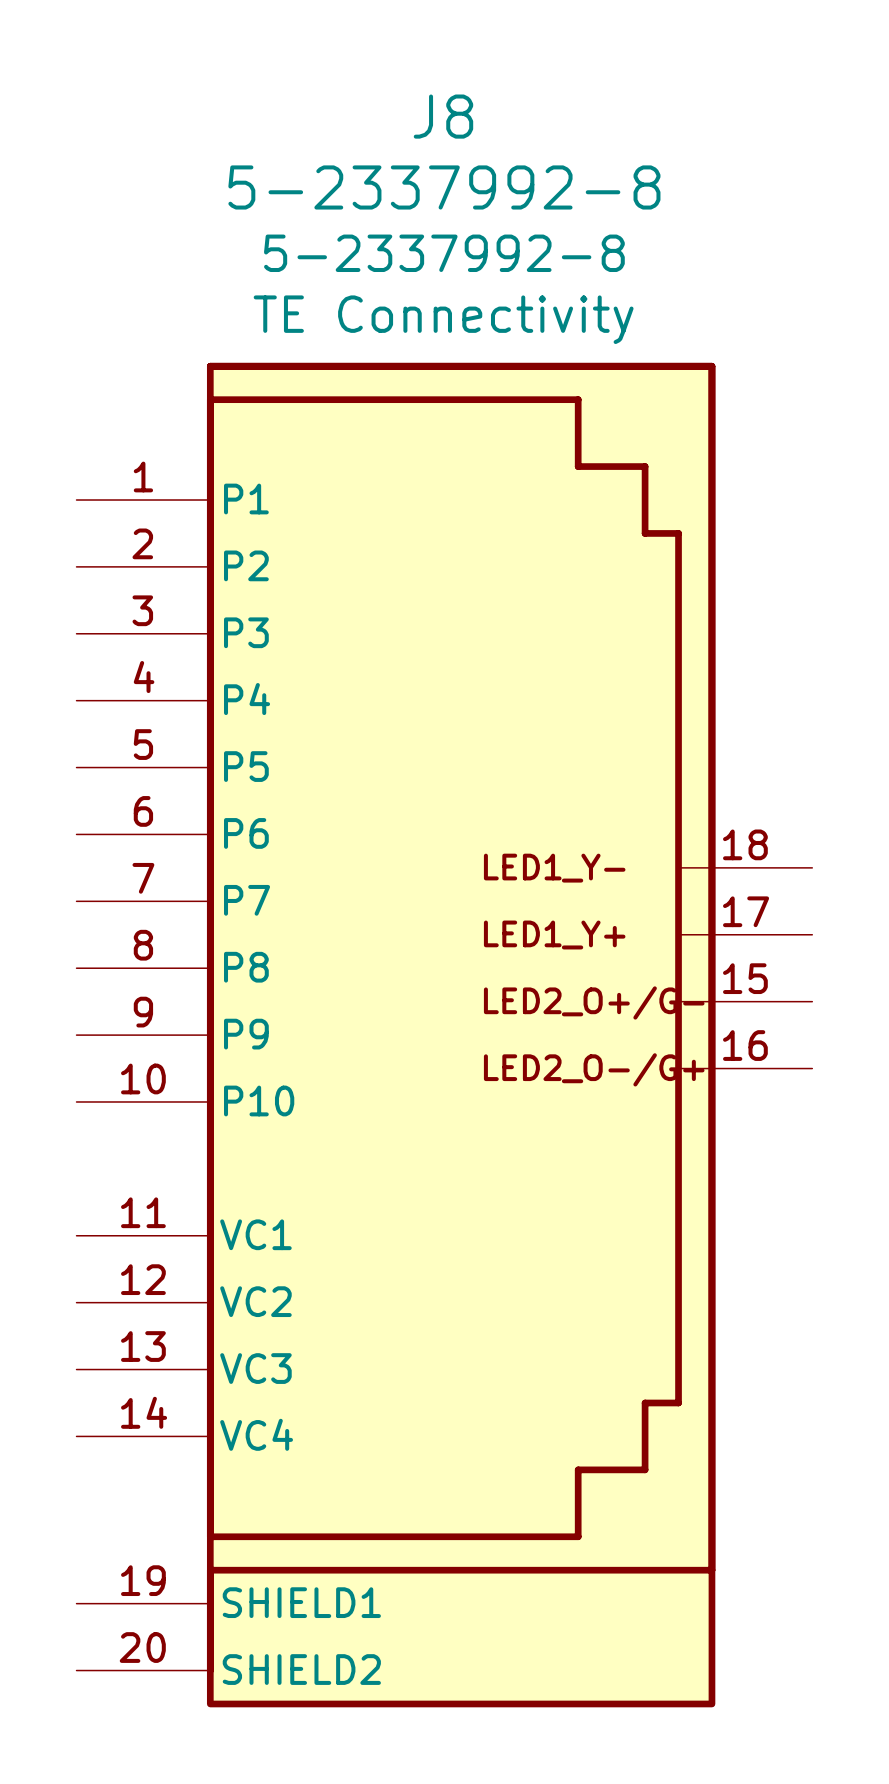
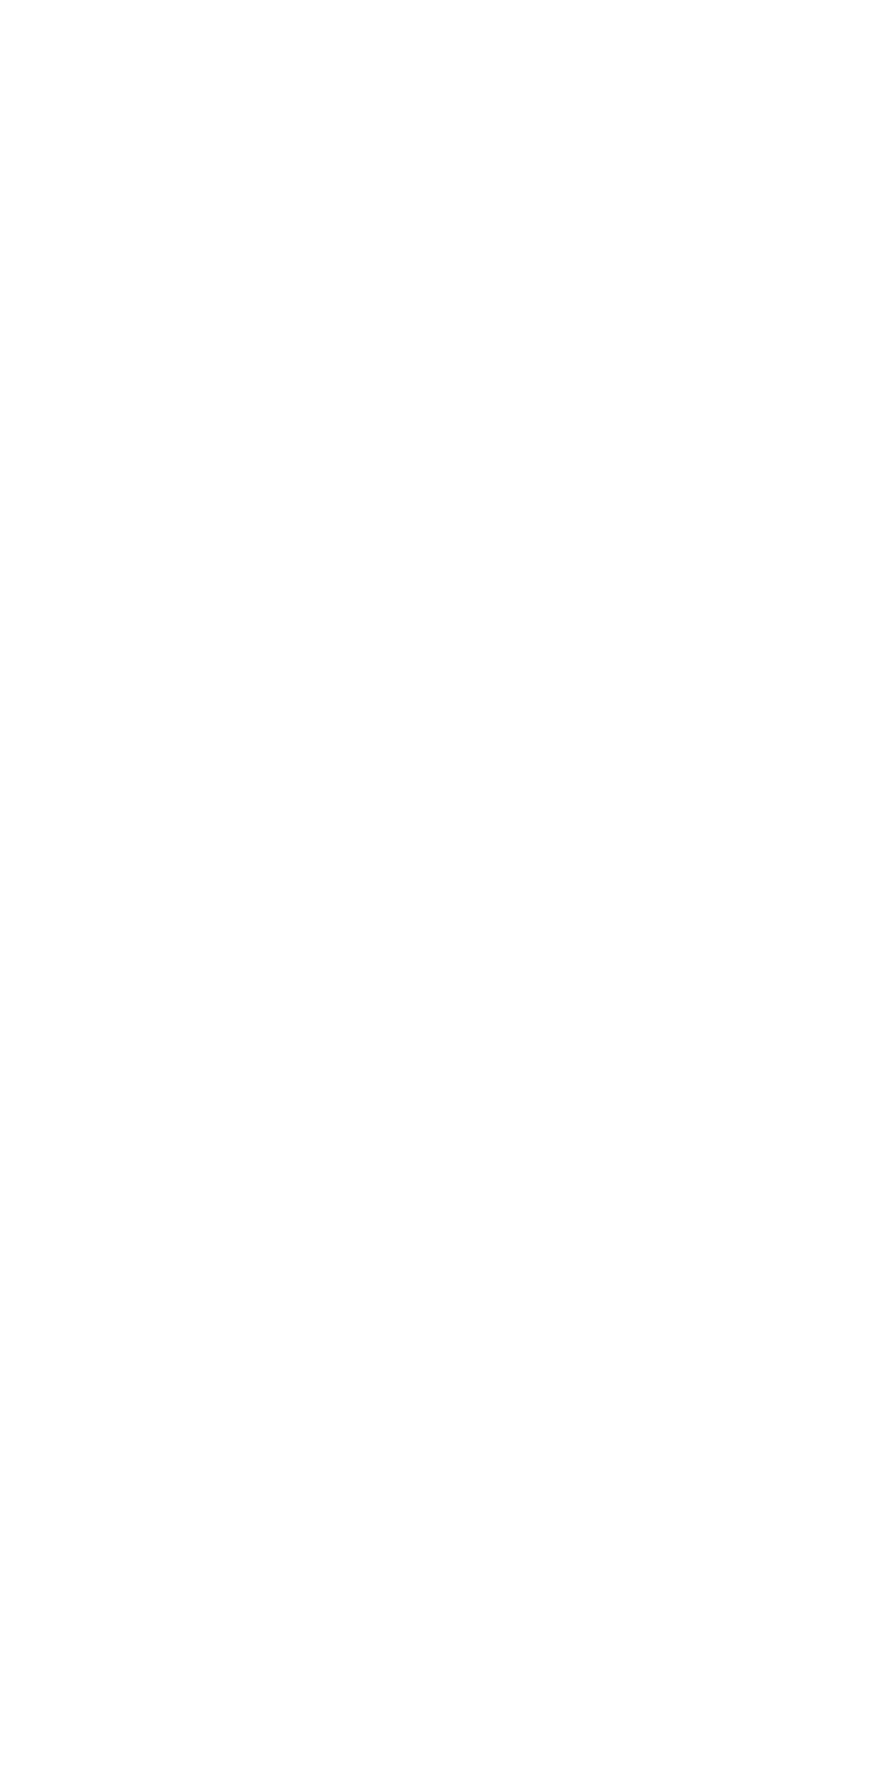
J8: 5-2337992-8 (444, 1035) -> none

